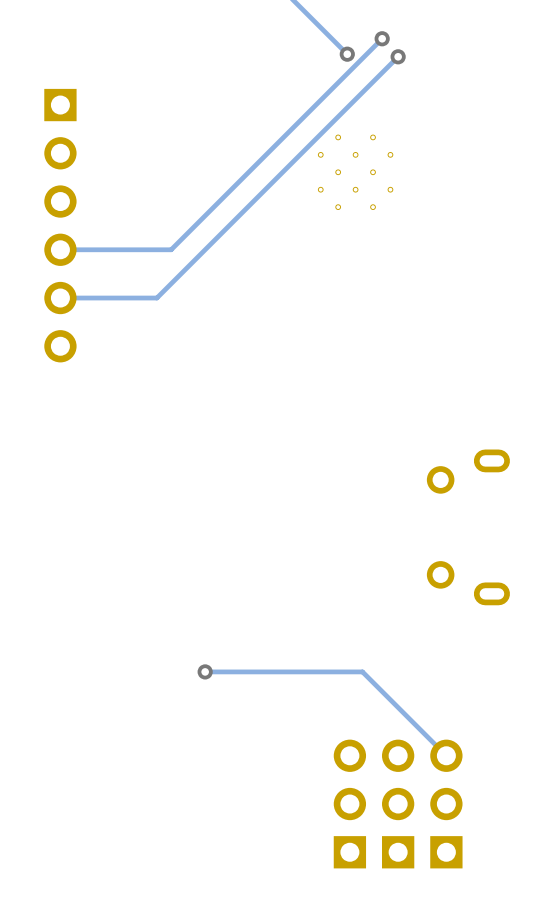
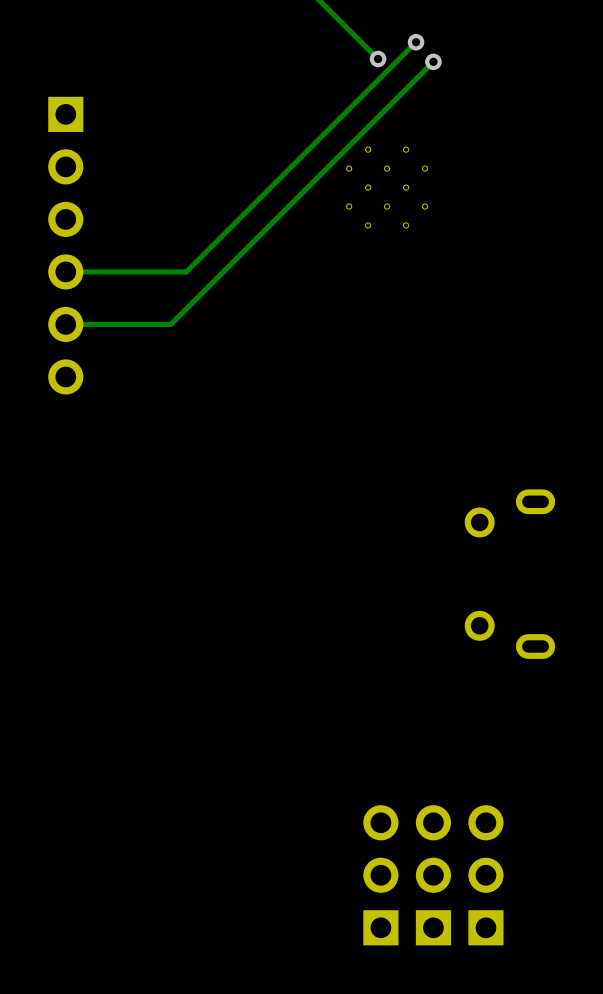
track: (205, 671) (362, 671) (446, 755) -> none
via: (205, 671) -> none

